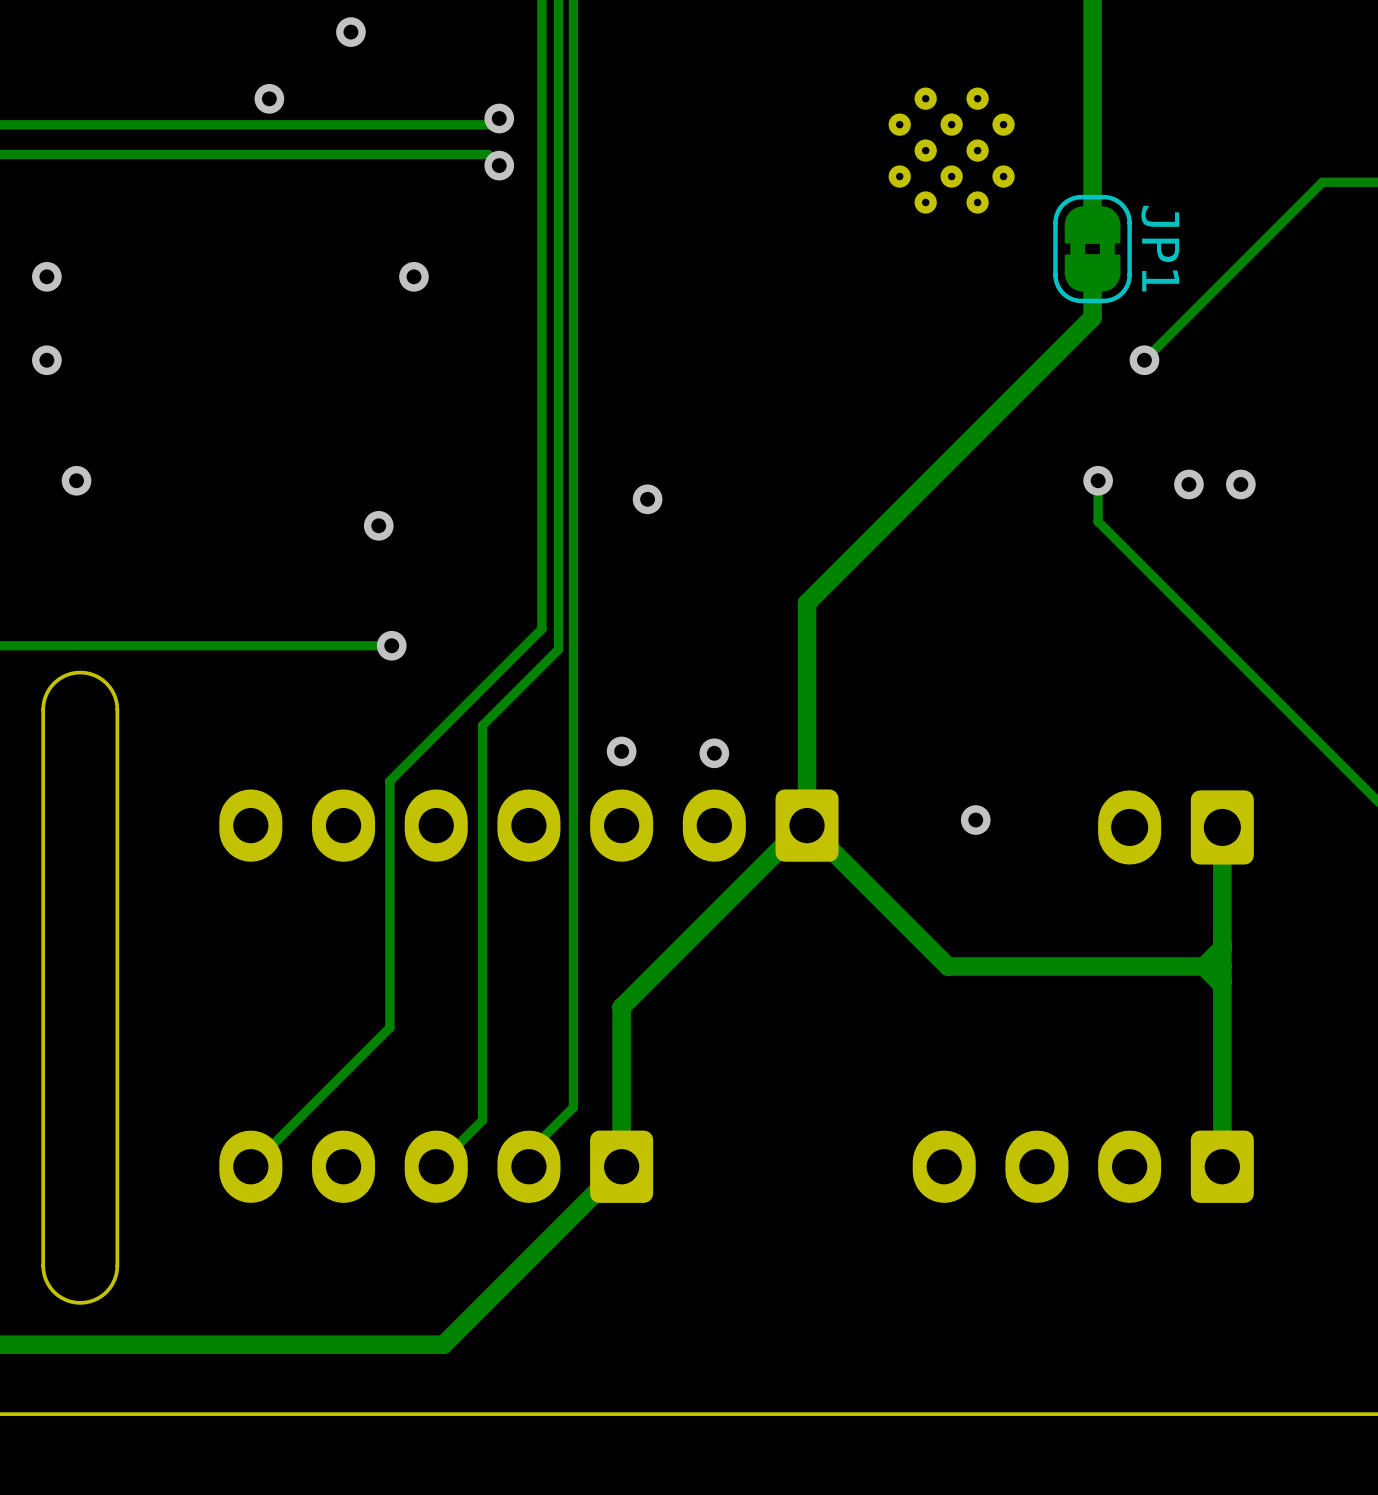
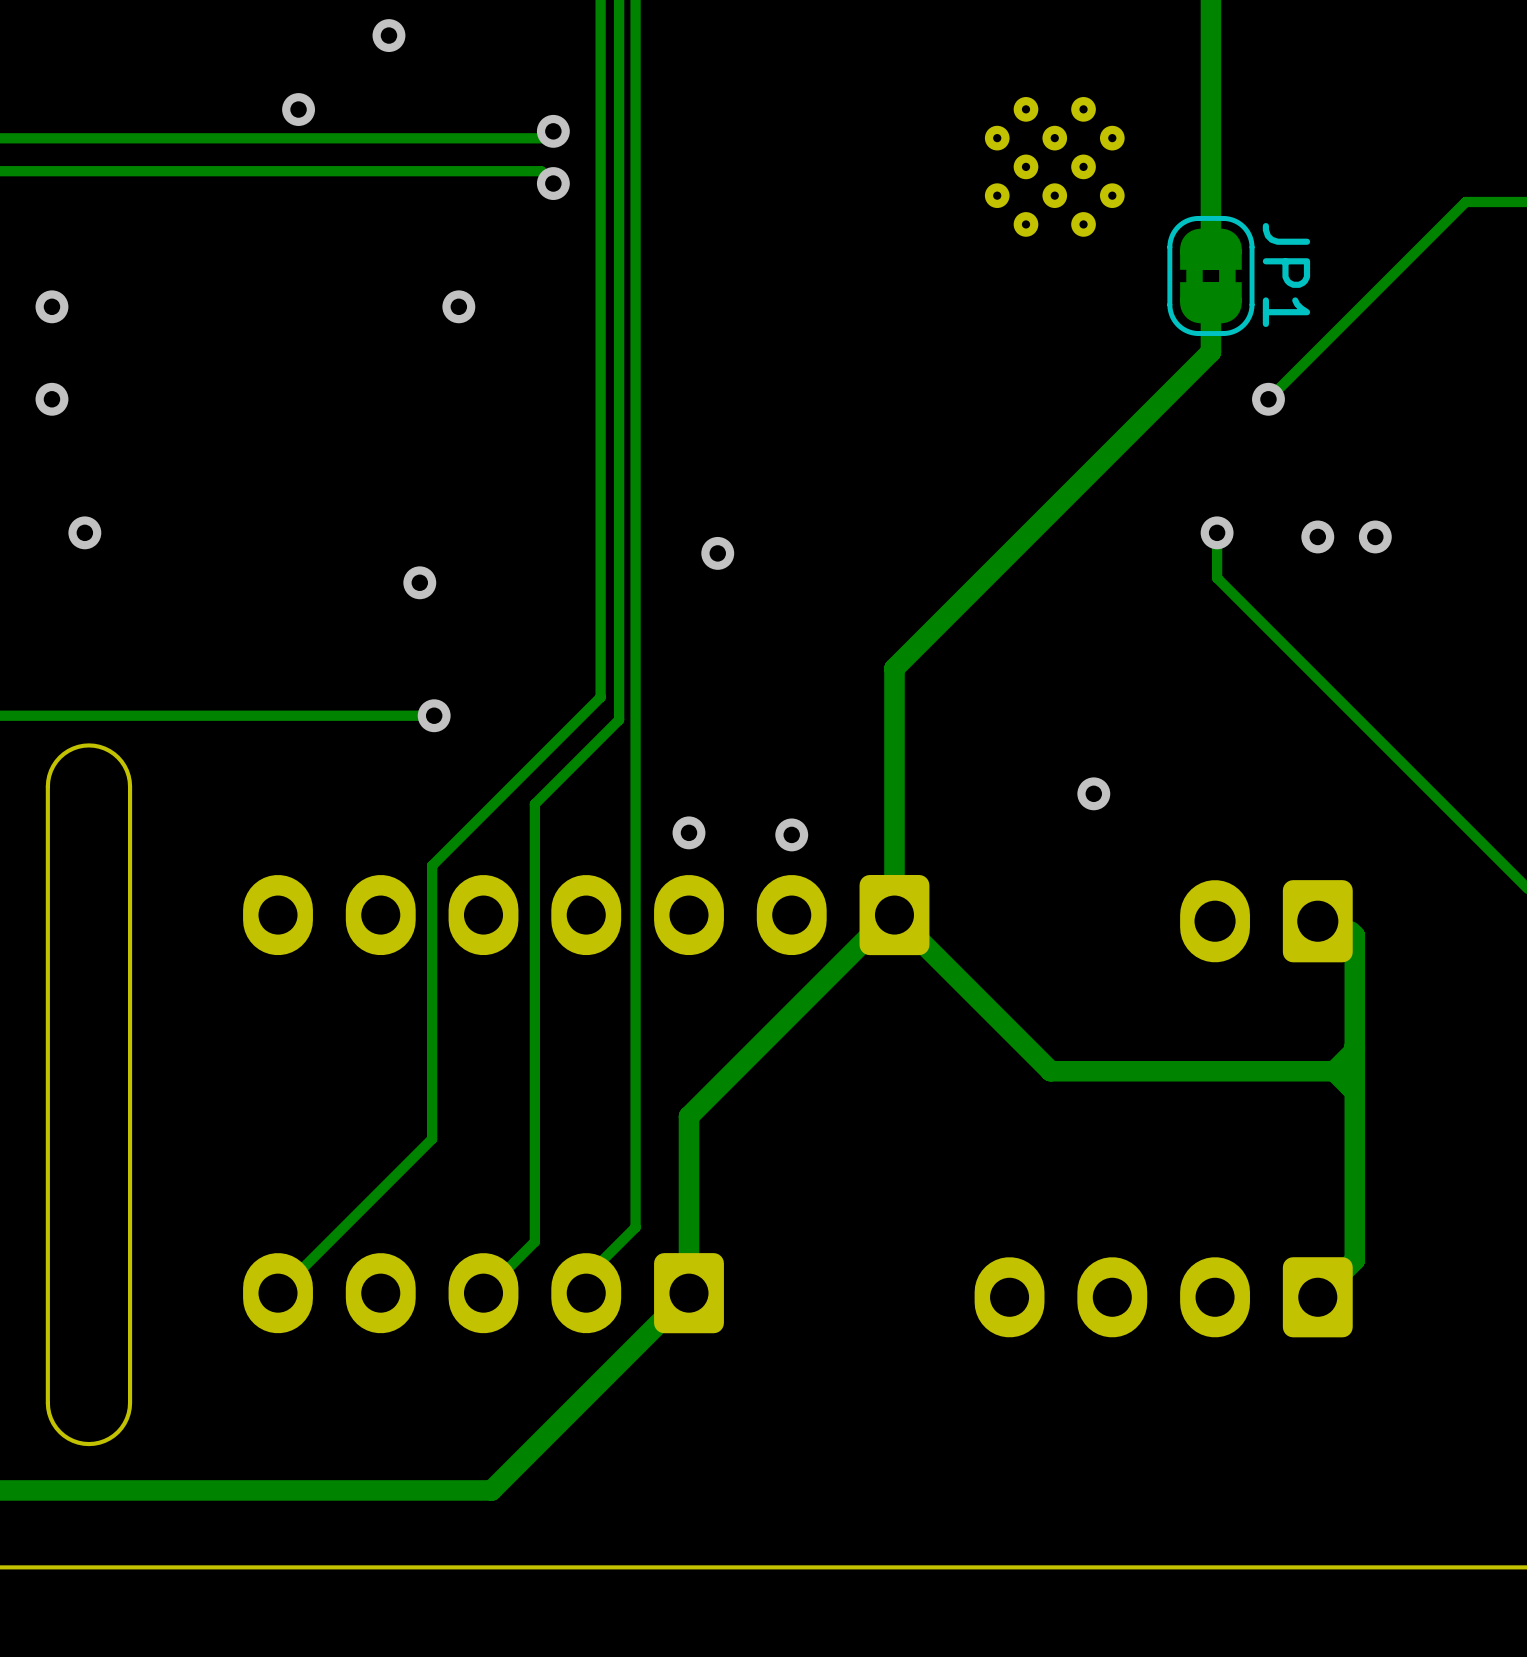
via position: (975, 820) -> (1093, 793)
part position: (1175, 827) -> (1266, 921)
part position: (1083, 1166) -> (1163, 1297)

